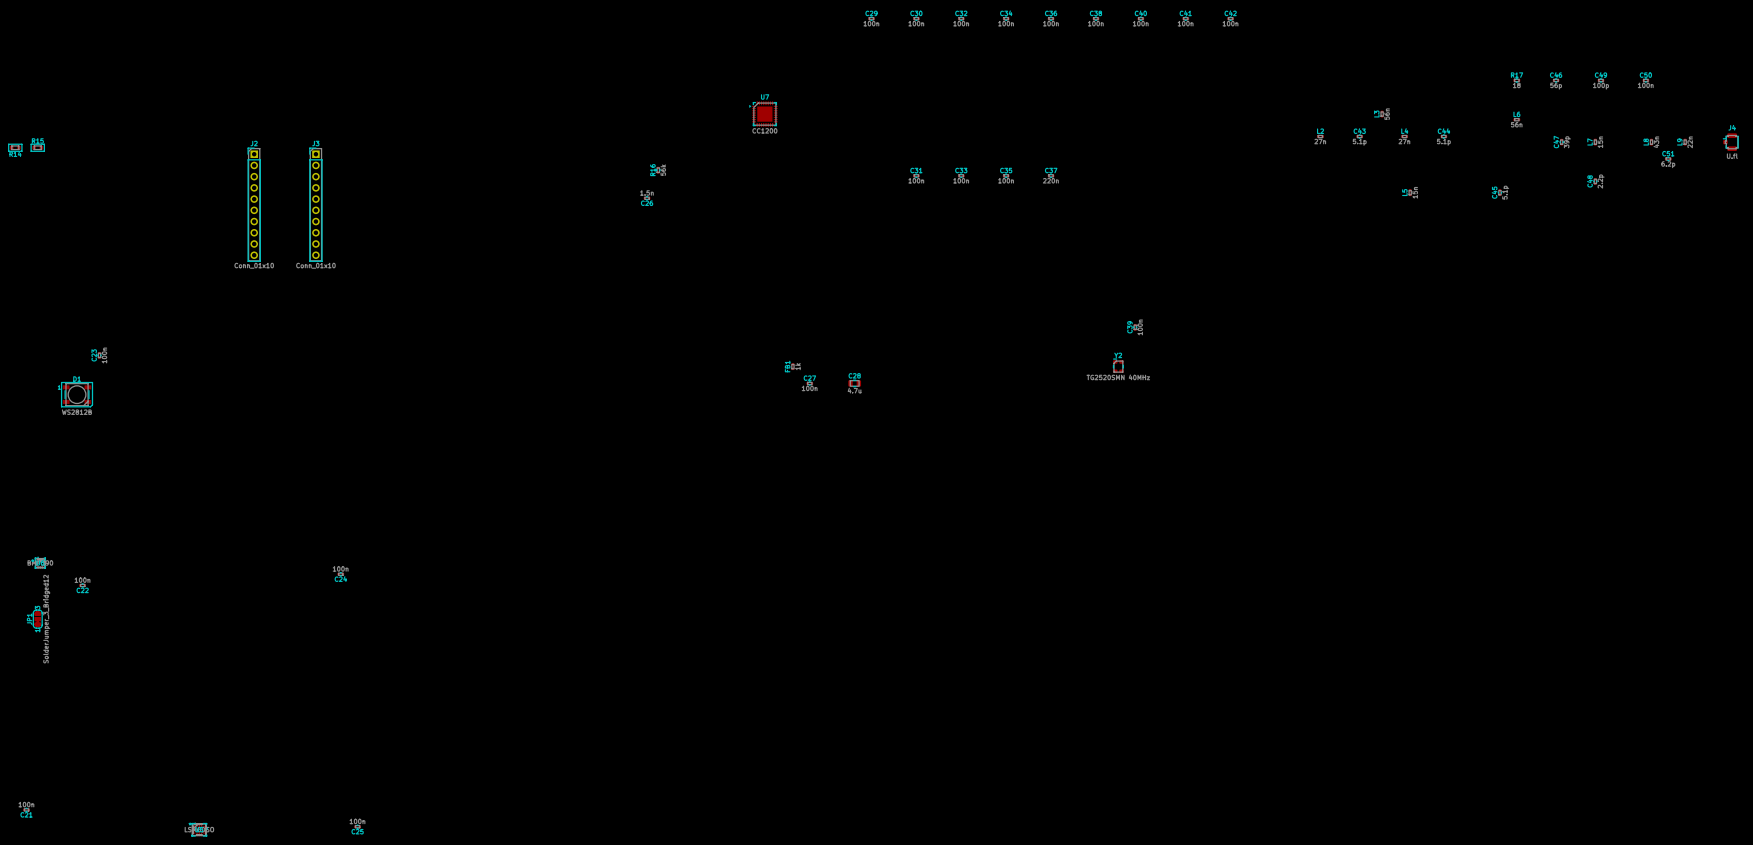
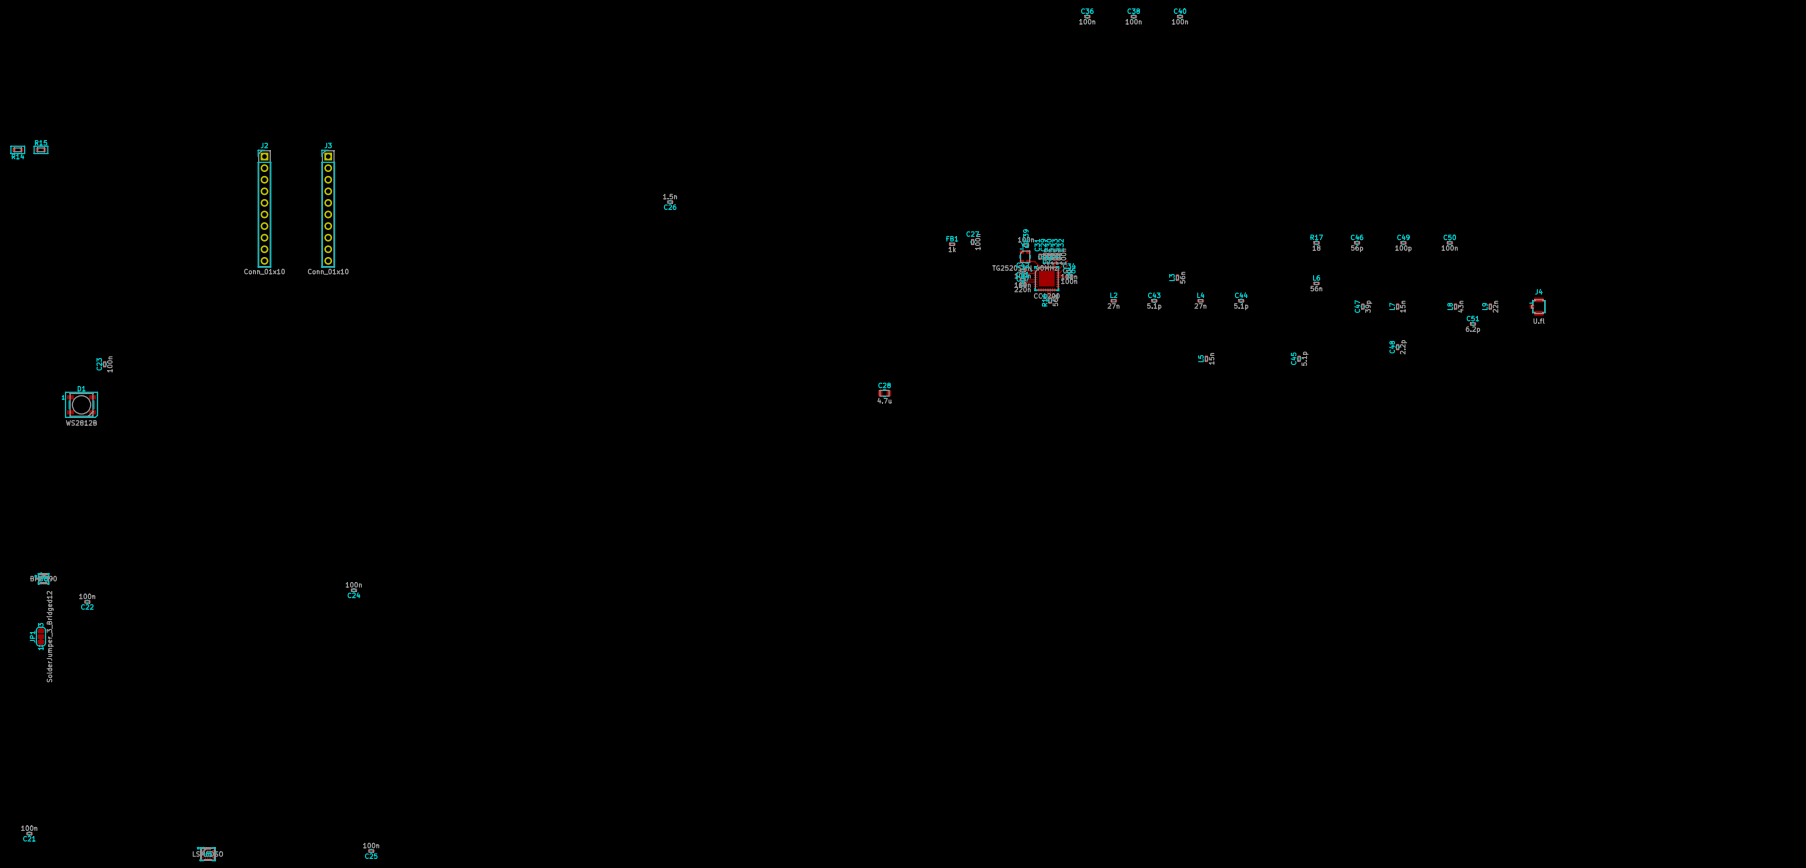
part rotation: 0° (871, 18) -> 90° clockwise (1044, 256)
part position: (871, 18) -> (1044, 256)
part rotation: 0° (916, 18) -> 90° clockwise (1049, 256)
part position: (916, 18) -> (1049, 256)
part rotation: 0° (961, 18) -> 90° clockwise (1058, 256)
part position: (961, 18) -> (1058, 256)
part position: (1006, 18) -> (1069, 271)
part position: (1185, 18) -> (1022, 279)
part position: (1230, 18) -> (1022, 270)
part position: (1516, 80) -> (1316, 242)
part position: (1556, 80) -> (1357, 242)
part position: (1600, 80) -> (1403, 242)
part position: (1645, 80) -> (1449, 242)
part position: (763, 114) -> (1045, 278)
part position: (1382, 114) -> (1177, 277)
part position: (1516, 119) -> (1316, 283)
part position: (1320, 136) -> (1113, 300)
part position: (1359, 136) -> (1154, 300)
part position: (1404, 136) -> (1200, 300)
part position: (1443, 136) -> (1241, 300)
part position: (1561, 142) -> (1362, 306)
part position: (1595, 142) -> (1397, 306)
part position: (1651, 142) -> (1455, 306)
part position: (1685, 142) -> (1490, 306)
part position: (1730, 142) -> (1537, 306)
part position: (1668, 158) -> (1472, 324)
part position: (658, 170) -> (1050, 300)
part rotation: 0° (916, 175) -> 90° clockwise (1040, 256)
part position: (916, 175) -> (1040, 256)
part rotation: 0° (961, 175) -> 90° clockwise (1053, 256)
part position: (961, 175) -> (1053, 256)
part position: (1006, 175) -> (1069, 276)
part position: (1051, 175) -> (1022, 284)
part position: (1595, 181) -> (1397, 347)
part position: (1410, 192) -> (1206, 358)
part position: (1499, 192) -> (1299, 358)
top track: none -> (1058, 258) (1054, 262) (1054, 267)
top track: none -> (1028, 261) (1034, 261) (1038, 267)
top track: none -> (1067, 261) (1057, 270)
top track: none -> (1067, 265) (1057, 272)
top track: none -> (1025, 270) (1035, 270)
top track: none -> (1067, 271) (1062, 275) (1057, 275)
top track: none -> (1035, 272) (1018, 273)
top track: none -> (1067, 276) (1057, 277)
top track: none -> (1024, 279) (1035, 279)
top track: none -> (1035, 282) (1027, 282) (1024, 284)
top track: none -> (1047, 289) (1047, 295) (1045, 298)
top track: none -> (1050, 289) (1050, 298)
part rotation: 0° (1135, 327) -> 90° clockwise (1026, 245)
part position: (1135, 327) -> (1026, 245)
part position: (1118, 365) -> (1025, 256)
part rotation: 0° (792, 366) -> 90° clockwise (952, 244)
part position: (792, 366) -> (952, 244)
part rotation: 0° (809, 383) -> 90° clockwise (972, 242)
part position: (809, 383) -> (972, 242)

